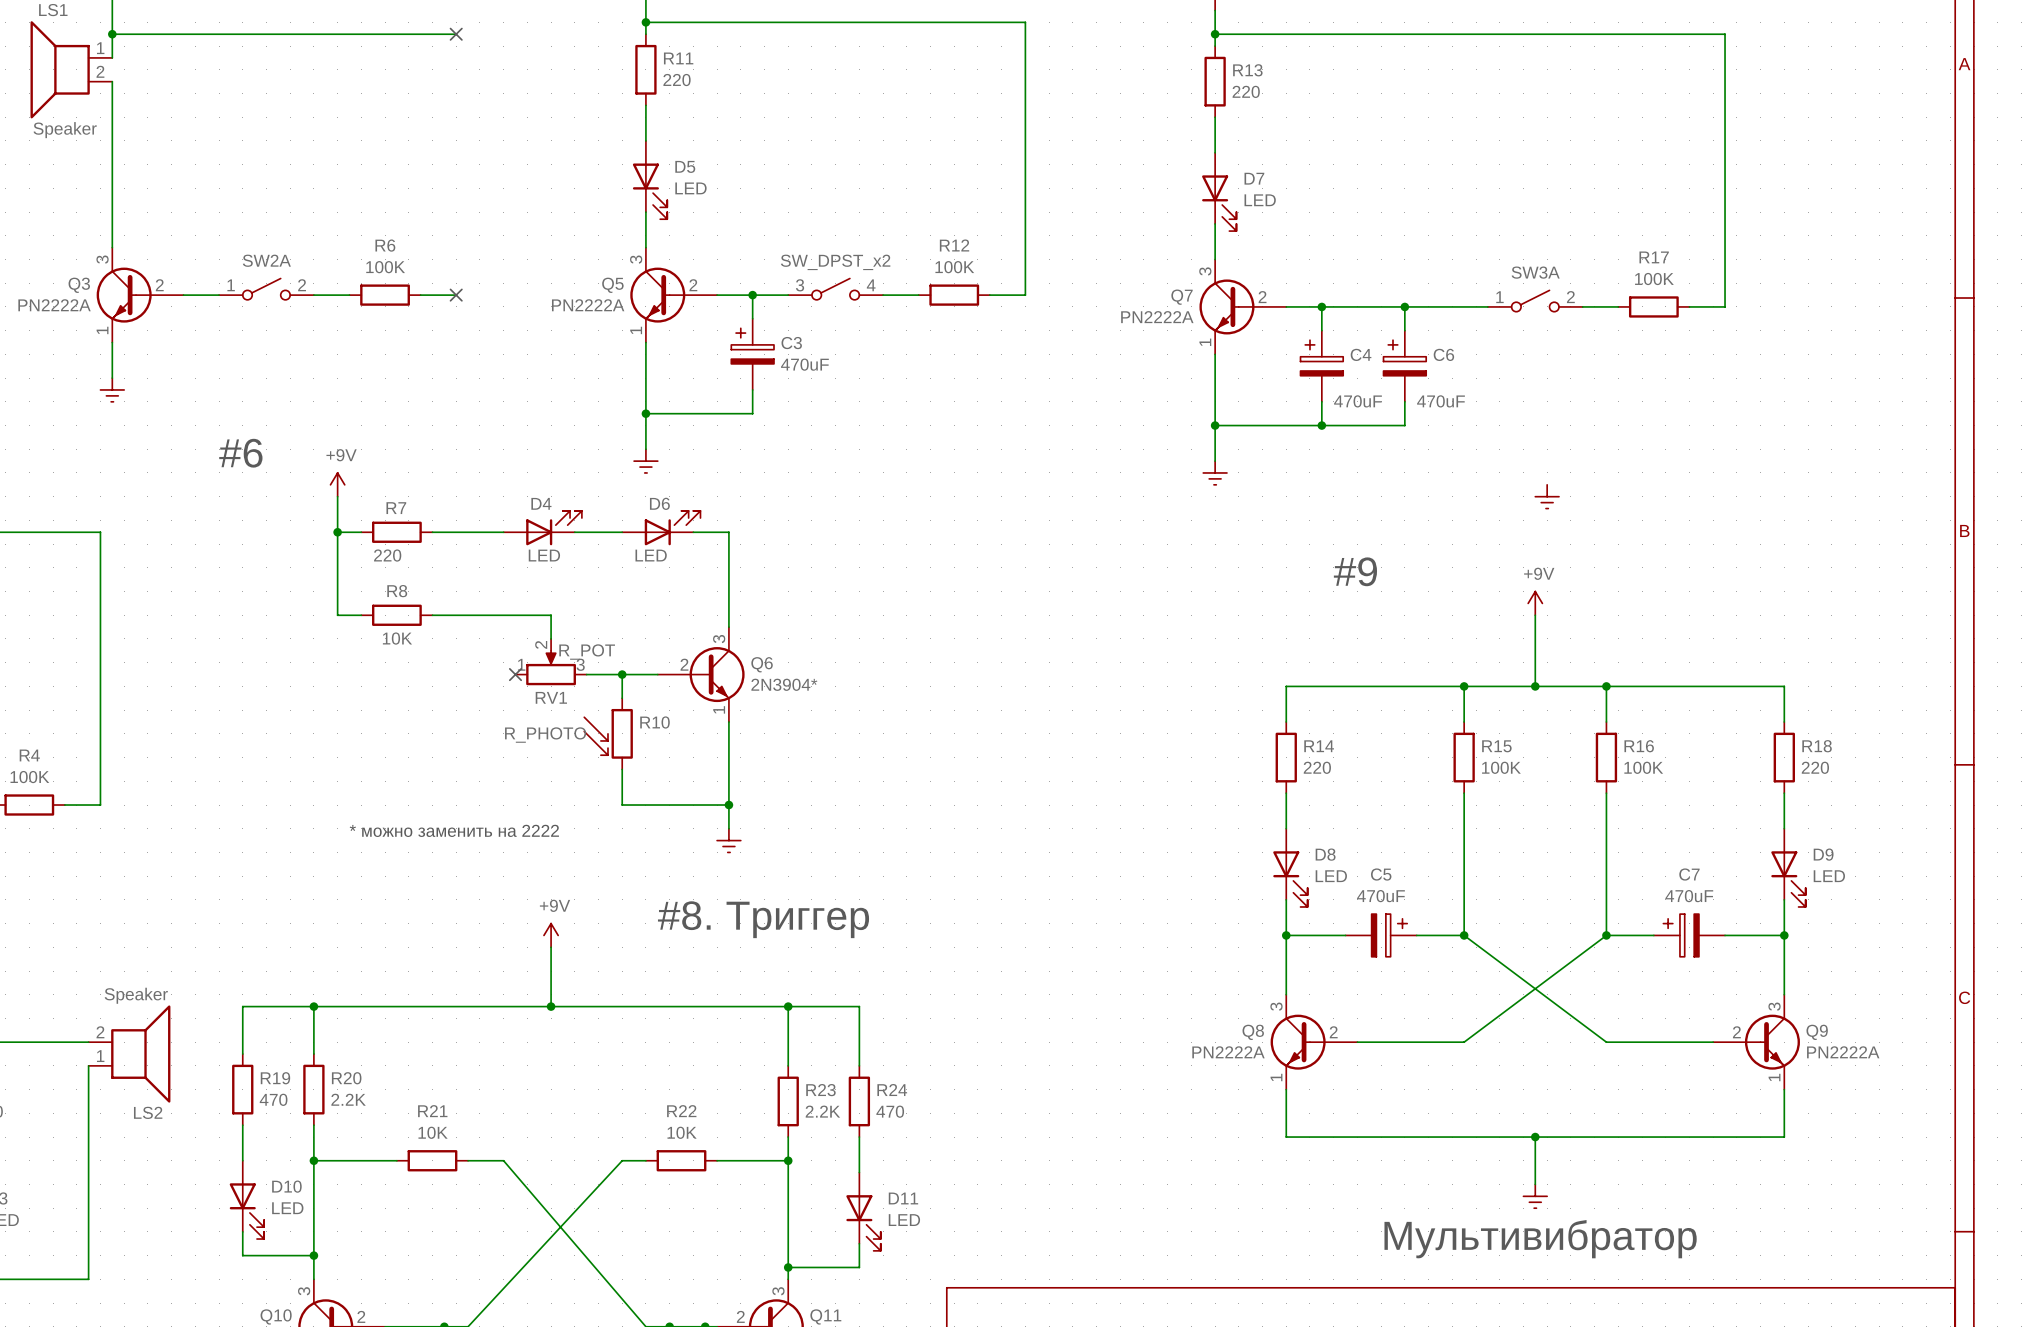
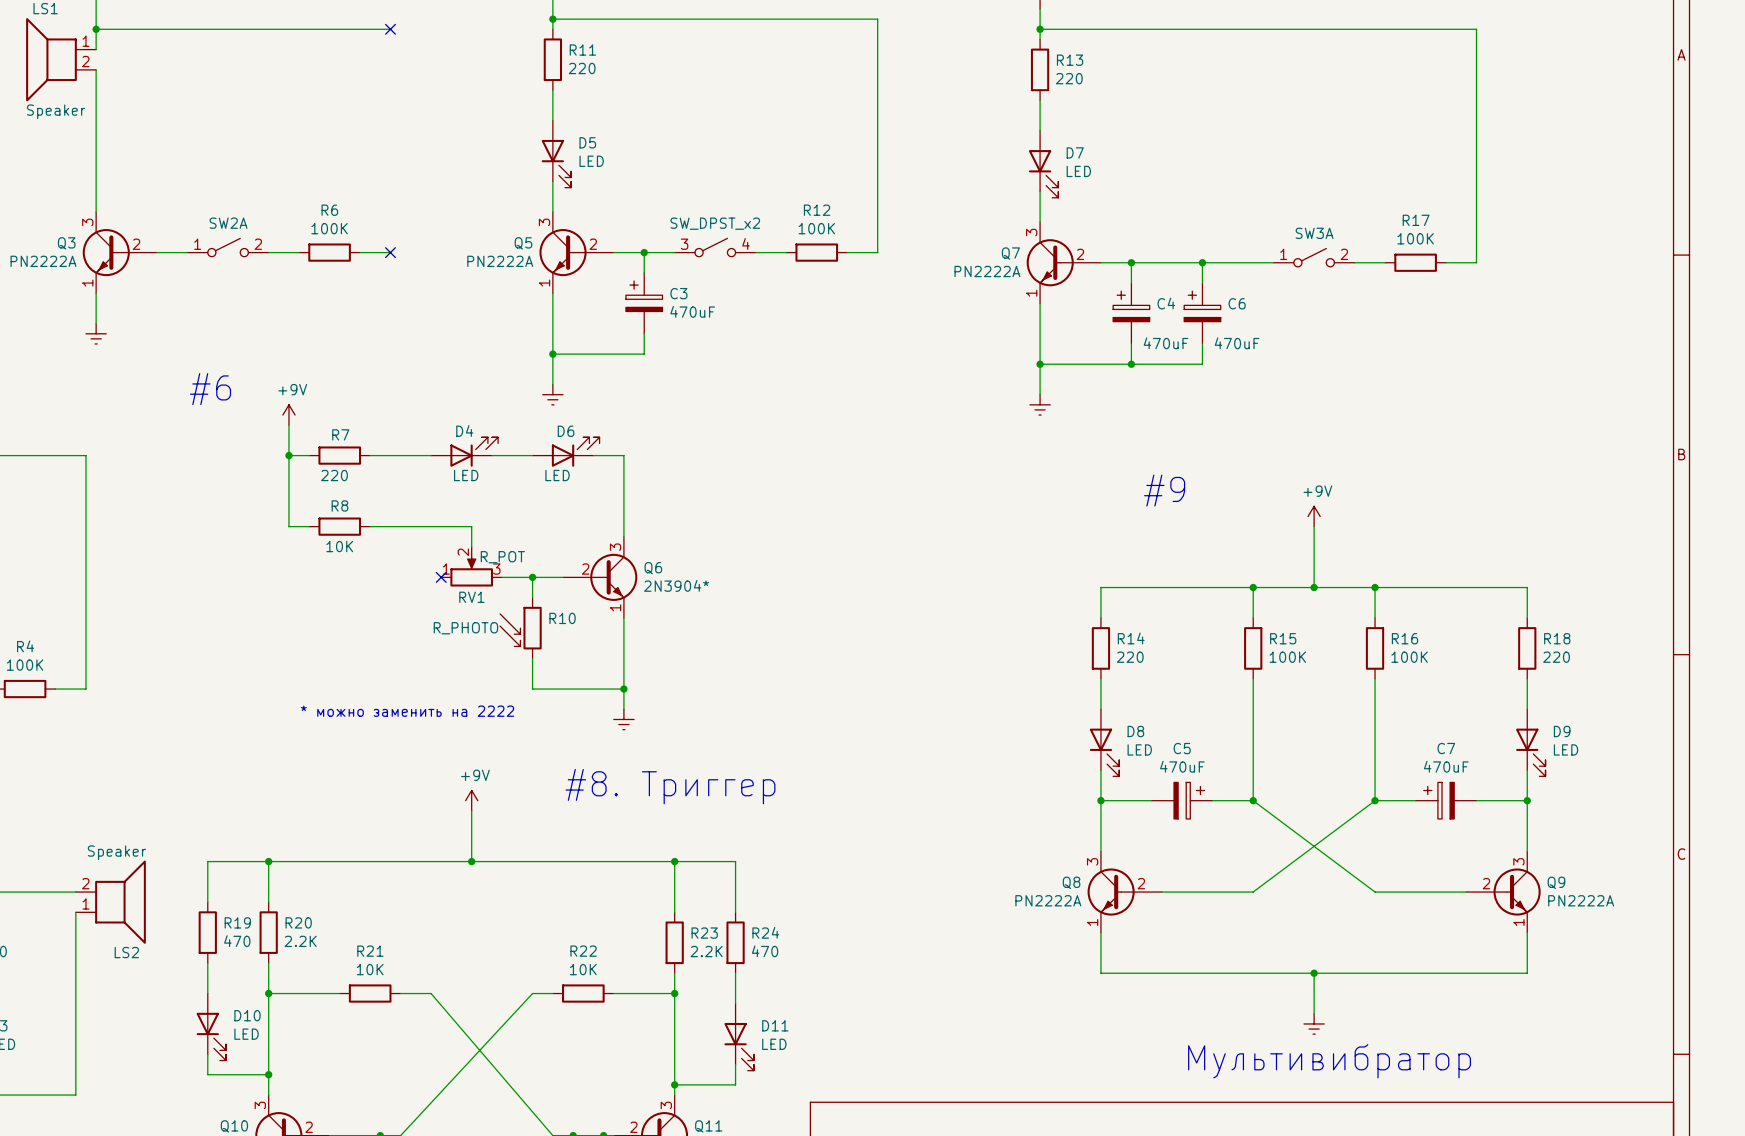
power symbol: (1547, 496) -> none

